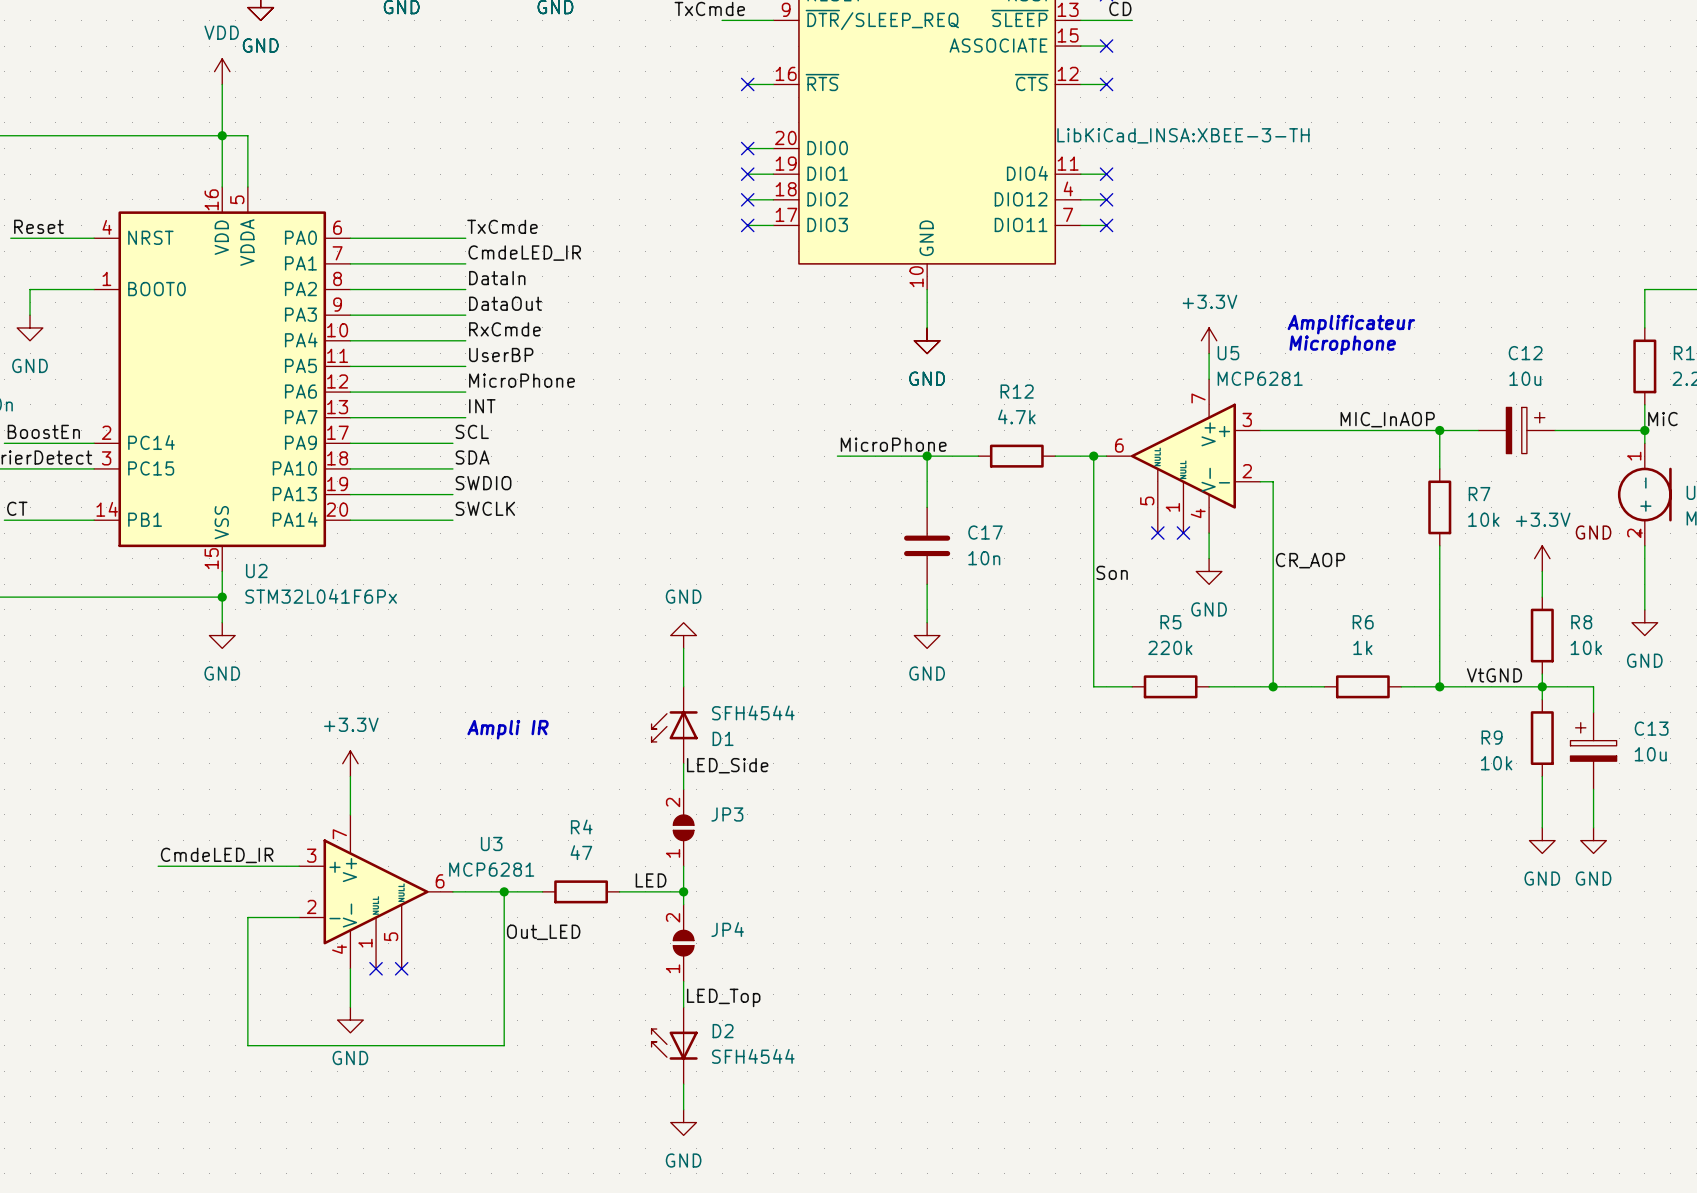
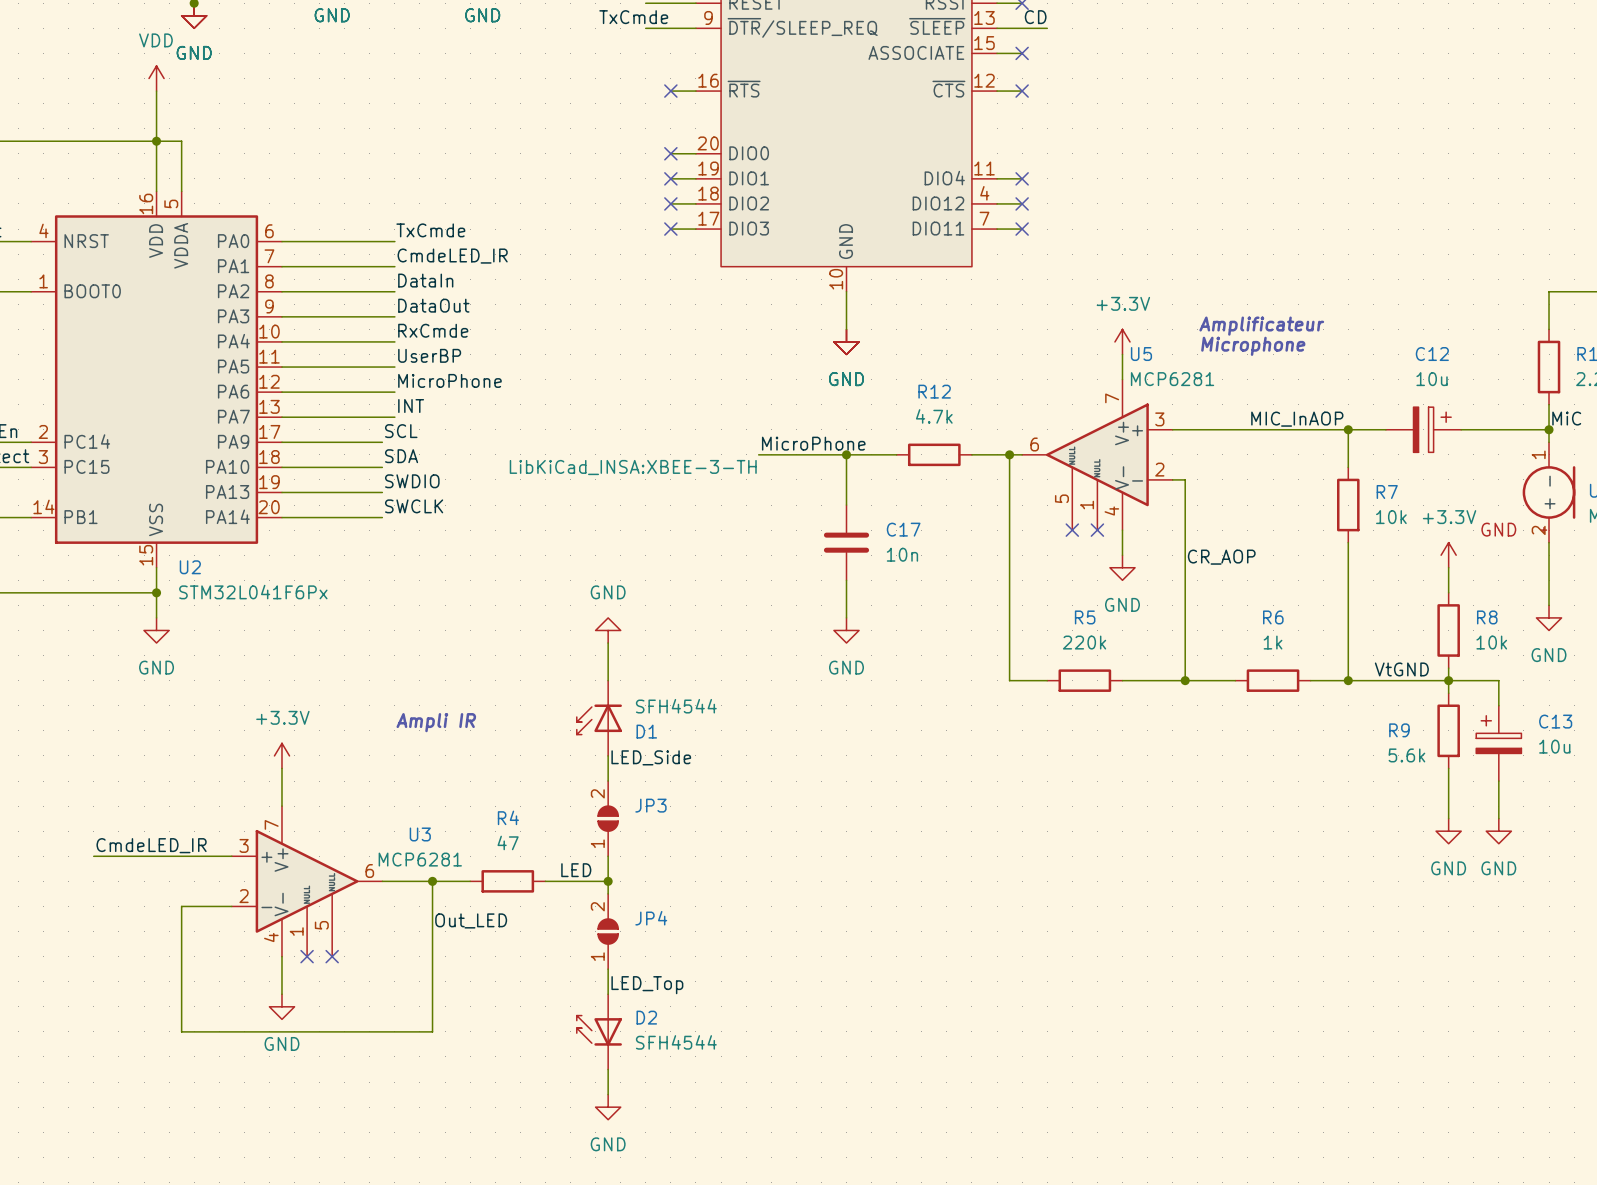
part text position: LibKiCad_INSA:XBEE-3-TH (1183, 135) -> LibKiCad_INSA:XBEE-3-TH (633, 467)
label: Son (1112, 572) -> none
R9 value: 10k (1496, 763) -> 5.6k (1406, 755)

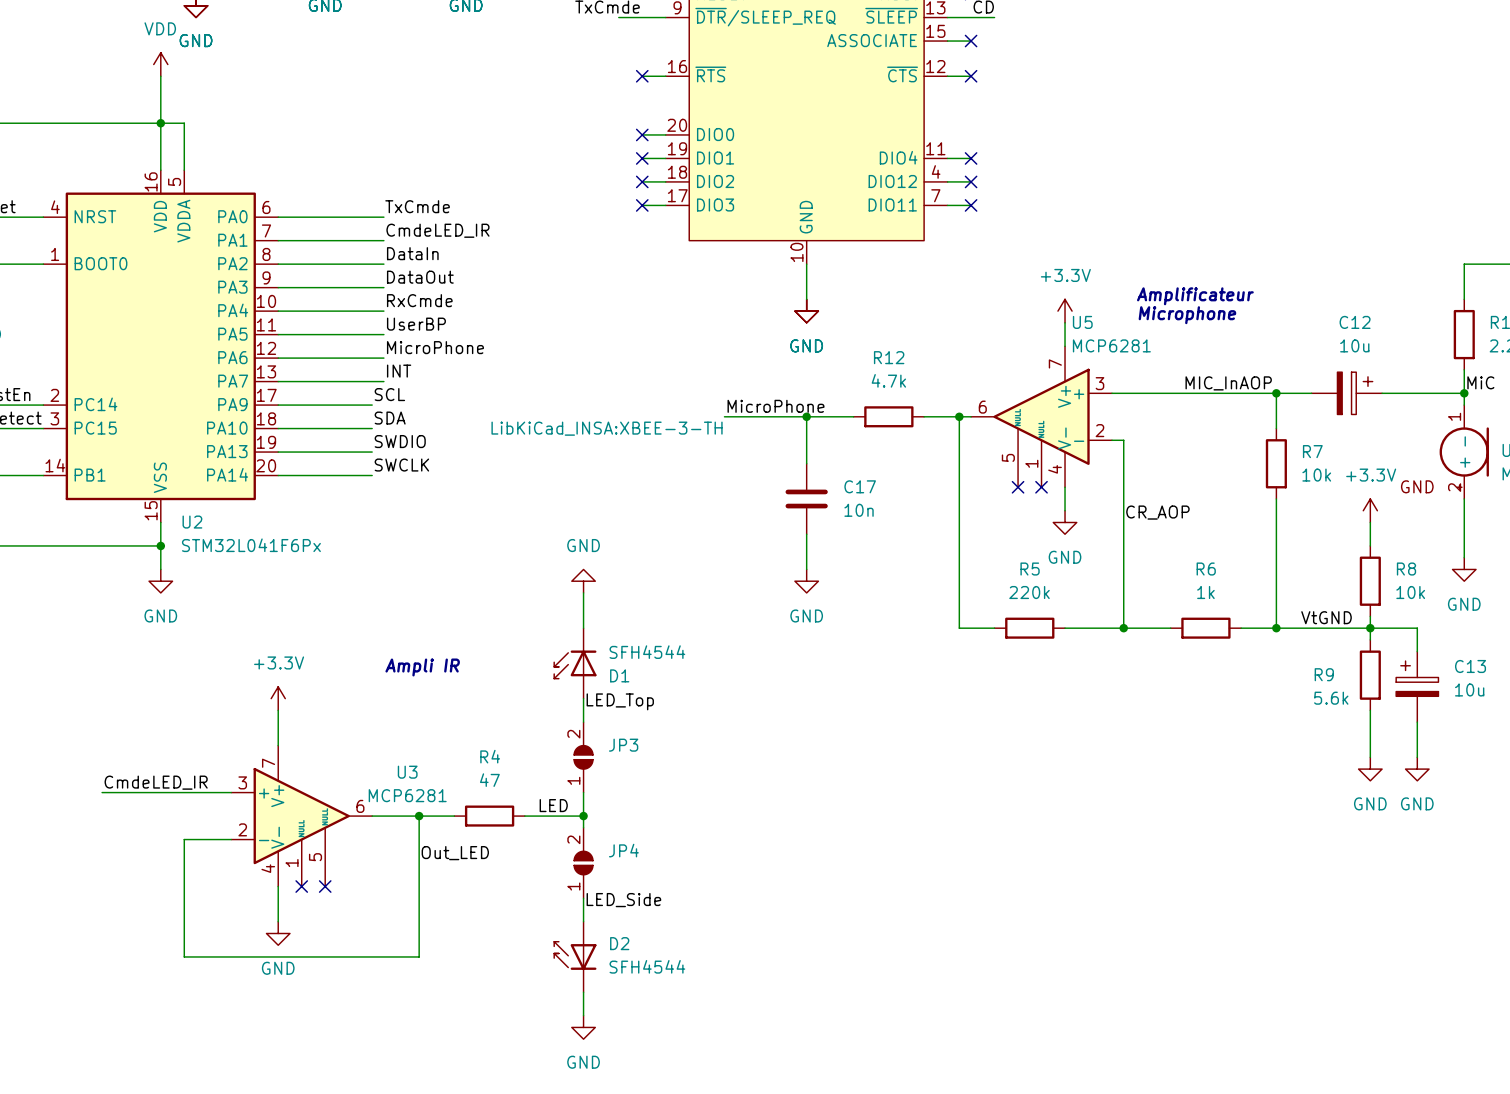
label: LED_Side (651, 757) -> LED_Top (620, 701)
label: none -> LED_Side (623, 900)
label: LED_Top (647, 985) -> none

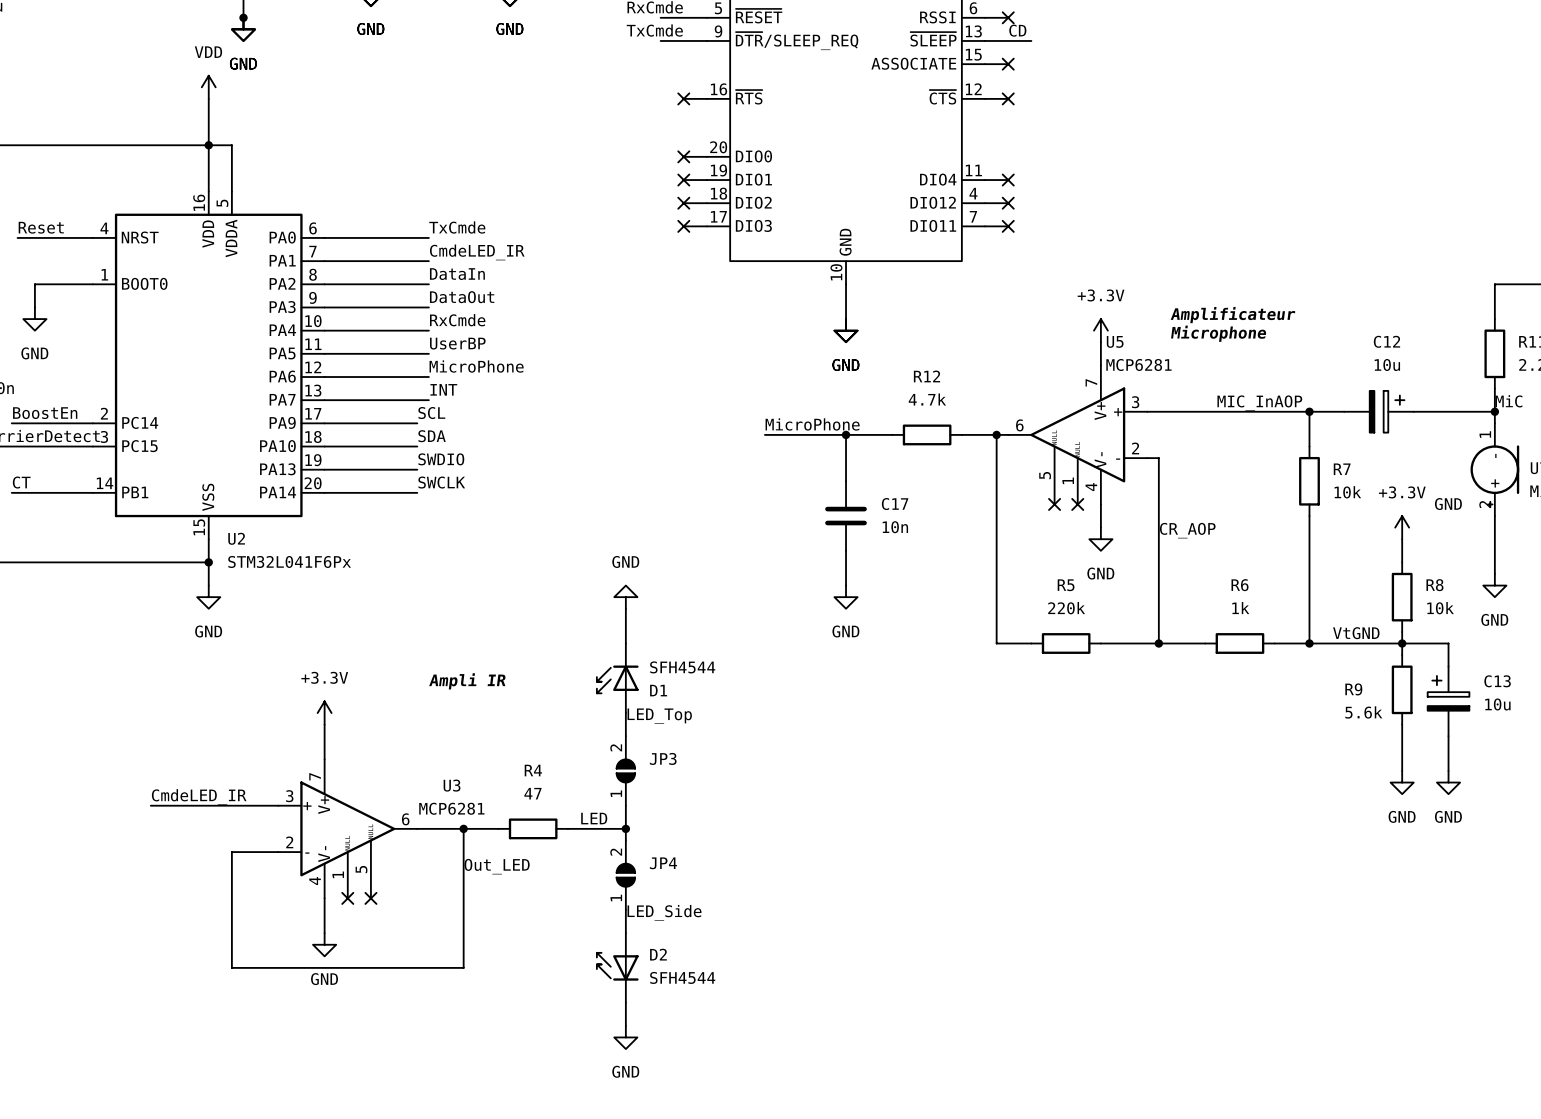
part text: LibKiCad_INSA:XBEE-3-TH (607, 428) -> none

